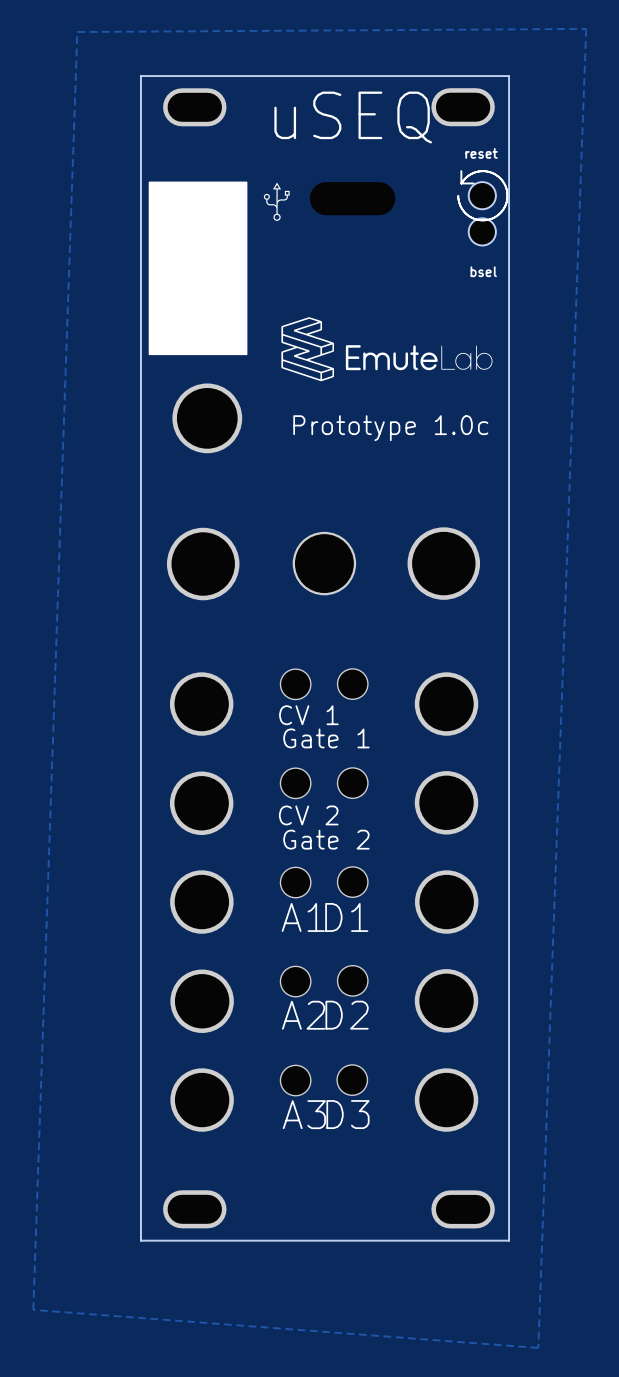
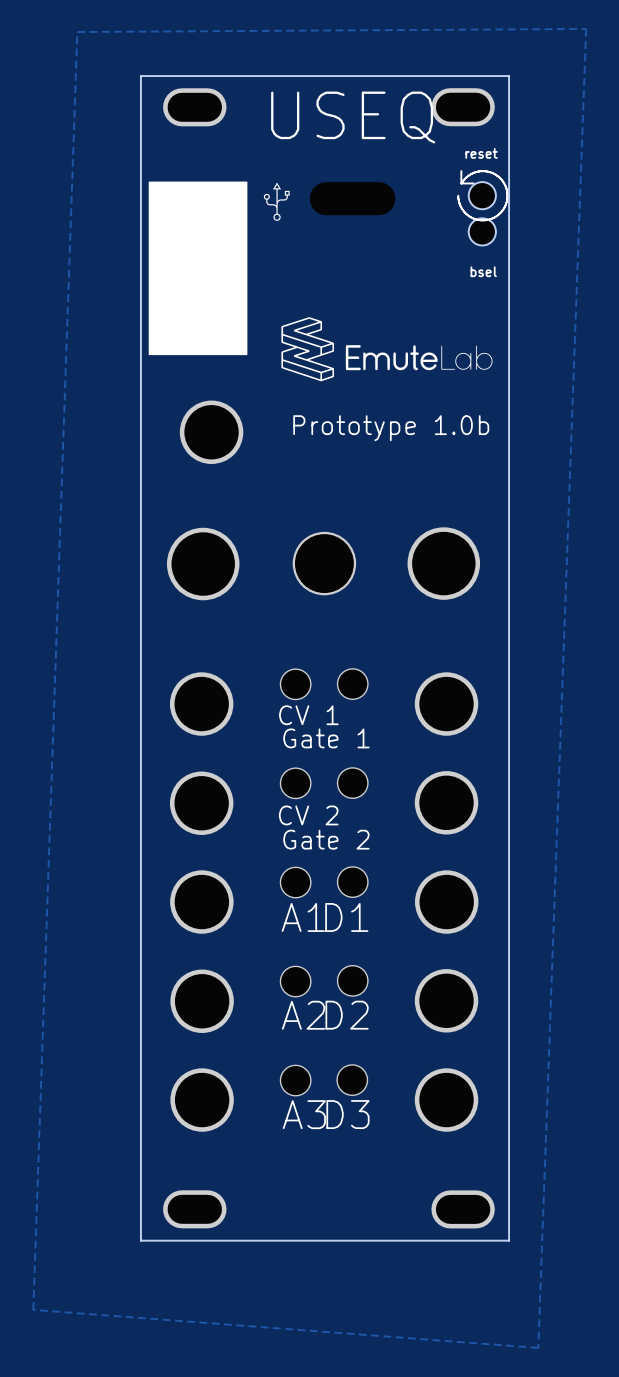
text: uSEQ (353, 117) -> USEQ (353, 117)
part: (207, 418) -> none
text: Prototype 1.0c (390, 428) -> Prototype 1.0b (391, 428)
part: none -> (211, 432)

